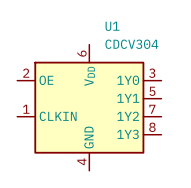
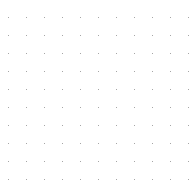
U1: CDCV304 (89, 107) -> none

